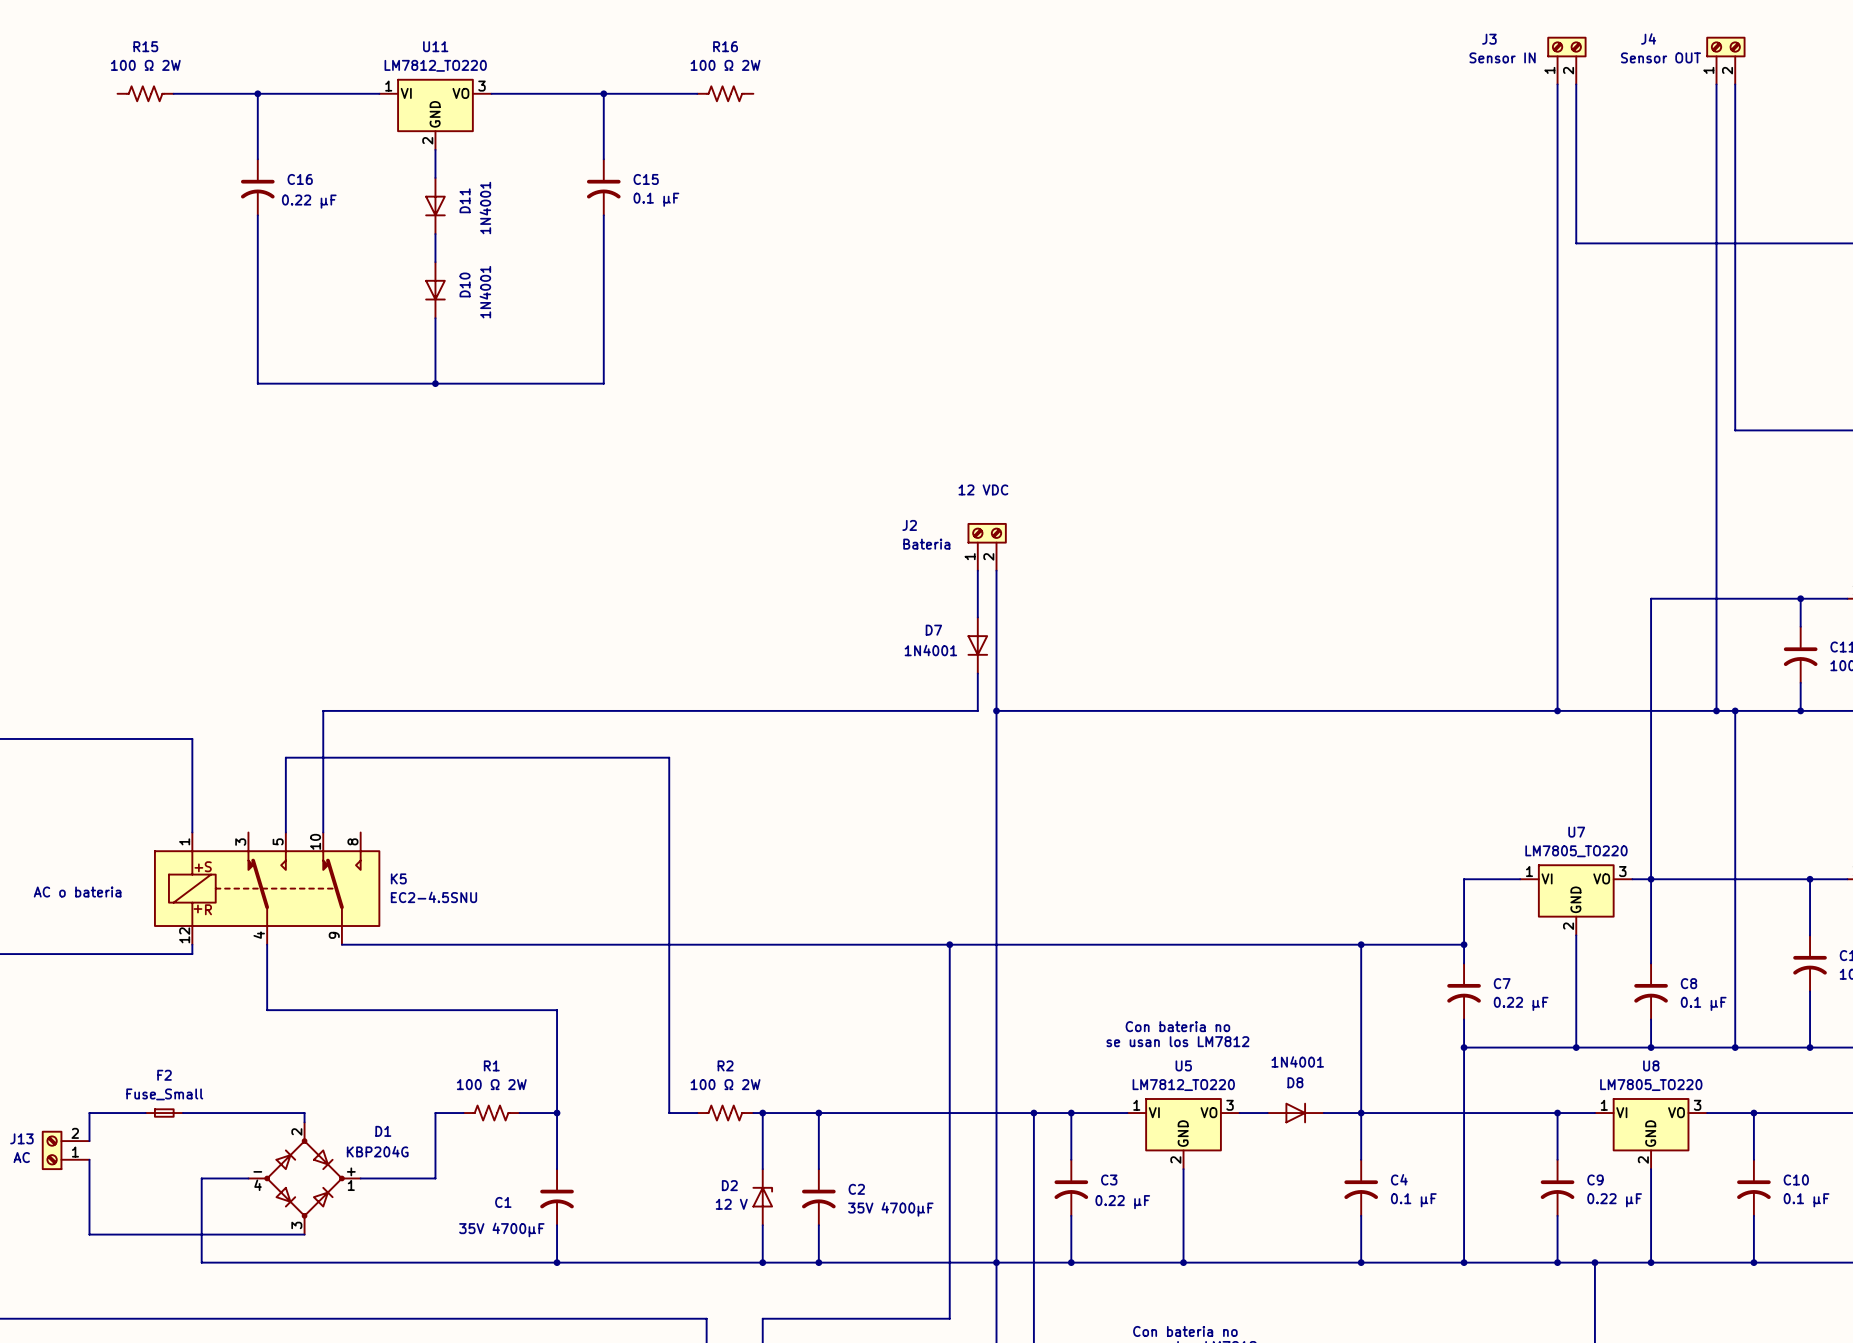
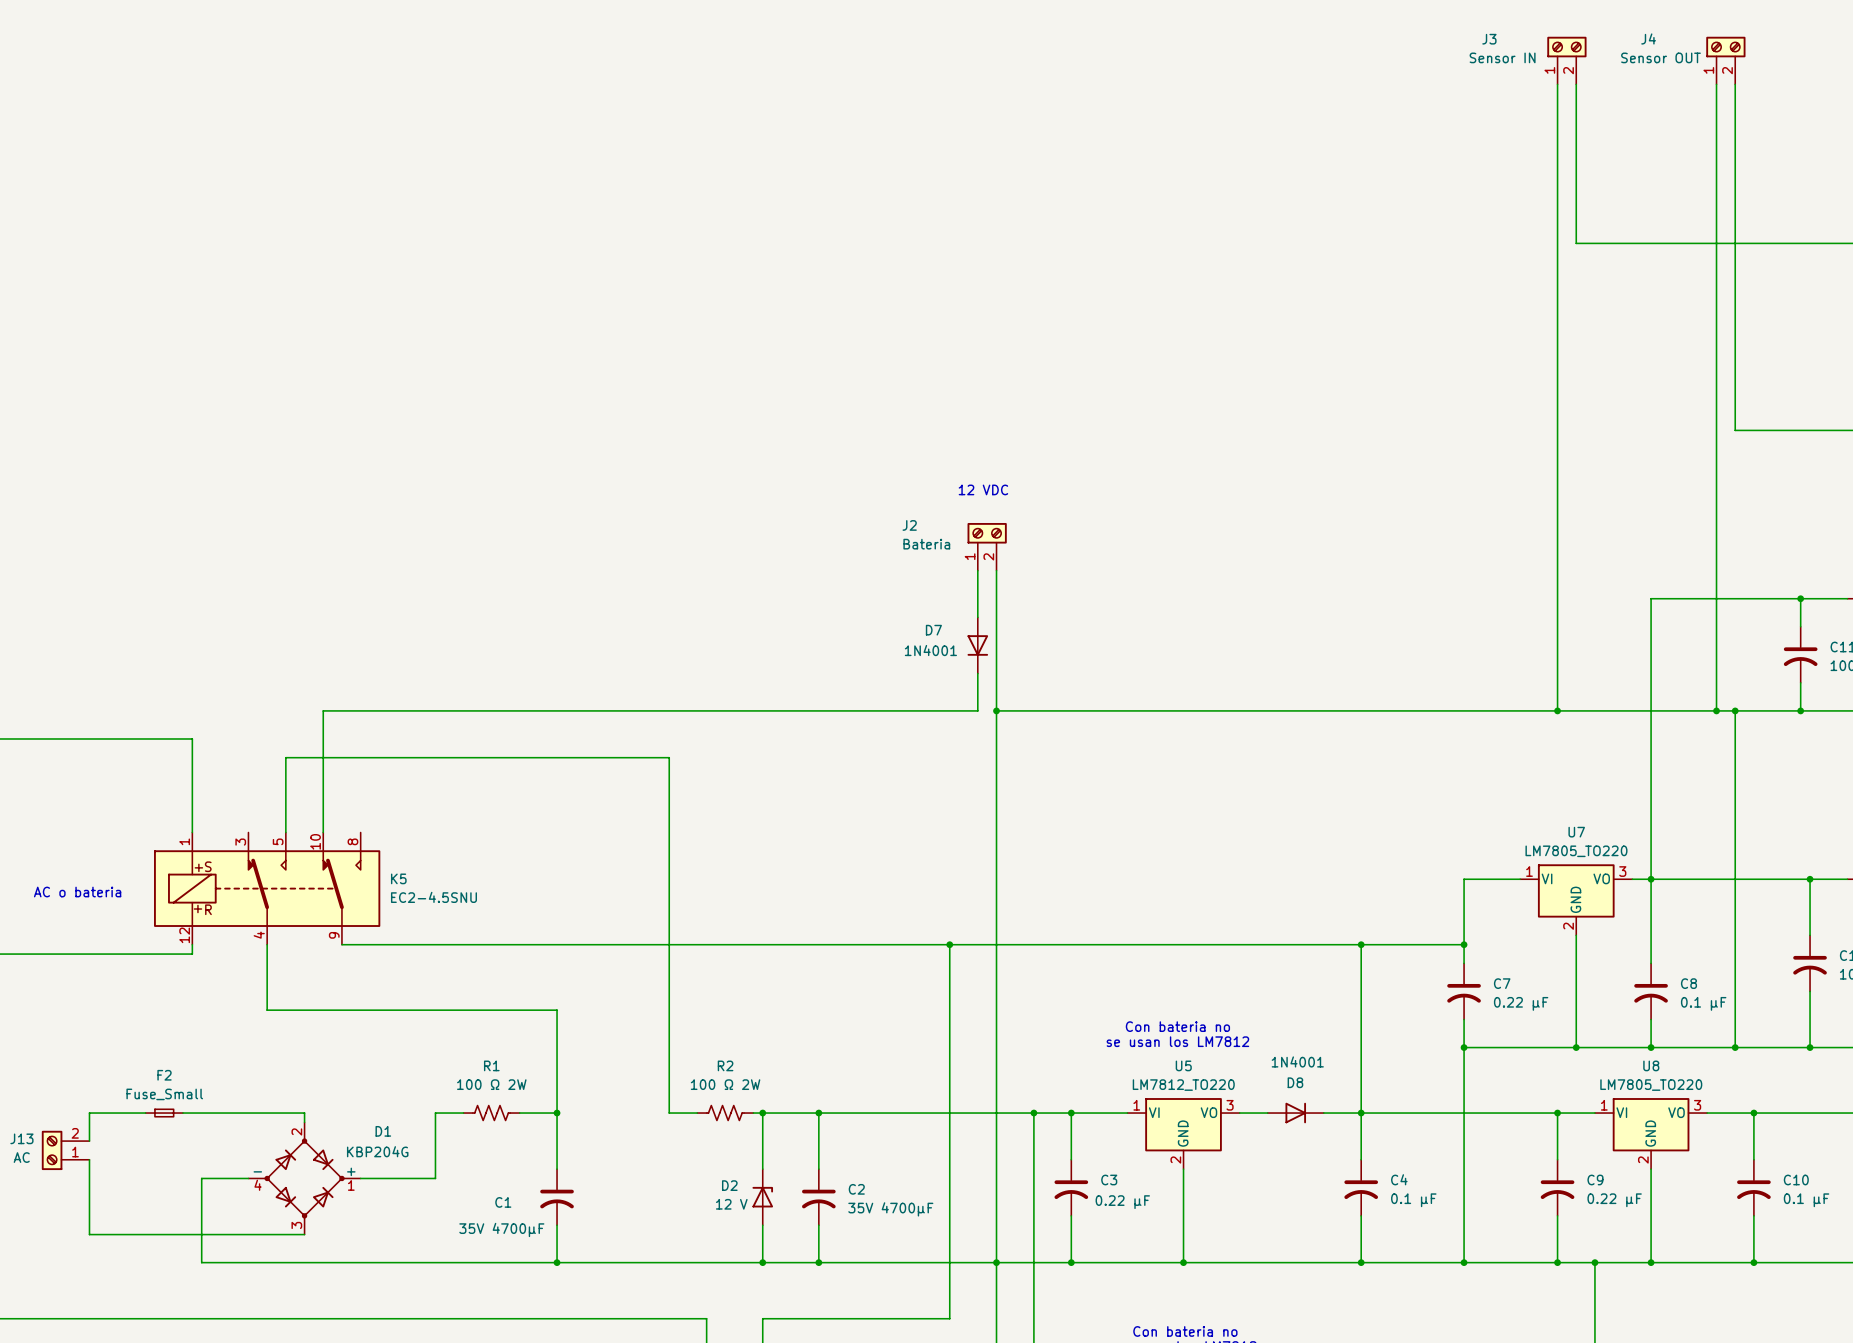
R15: 100 Ω 2W (145, 93) -> none
wire: (173, 93) (379, 93) -> none
wire: (257, 93) (257, 159) -> none
junction: (257, 93) -> none
wire: (491, 93) (697, 93) -> none
wire: (603, 93) (603, 159) -> none
junction: (603, 93) -> none
R16: 100 Ω 2W (725, 93) -> none
U11: LM7812_TO220 (435, 114) -> none
wire: (435, 149) (435, 177) -> none
C16: 0.22 μF (257, 187) -> none
C15: 0.1 μF (603, 187) -> none
D11: 1N4001 (435, 205) -> none
wire: (257, 215) (257, 383) (603, 383) (603, 215) -> none
wire: (435, 234) (435, 262) -> none
D10: 1N4001 (435, 290) -> none
wire: (435, 318) (435, 383) -> none
junction: (435, 383) -> none

